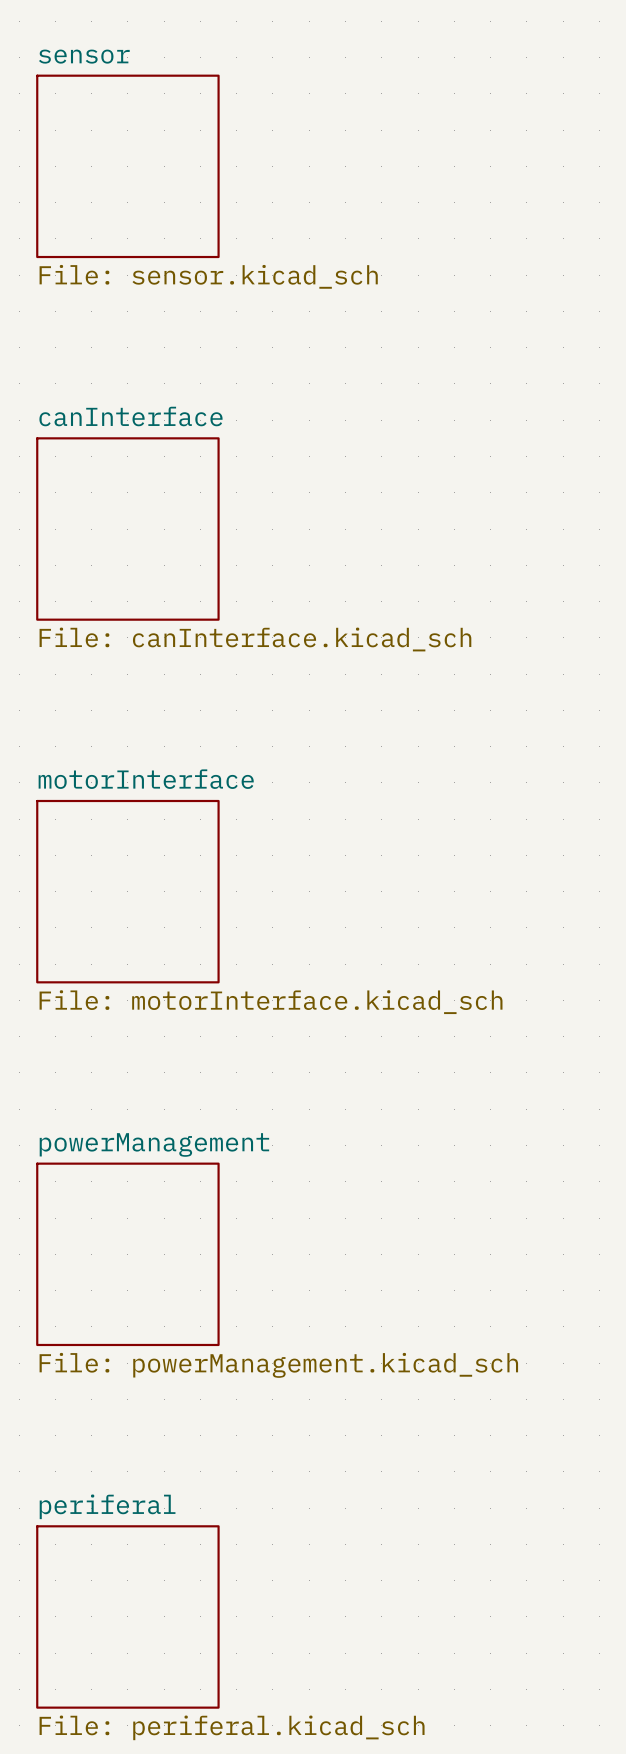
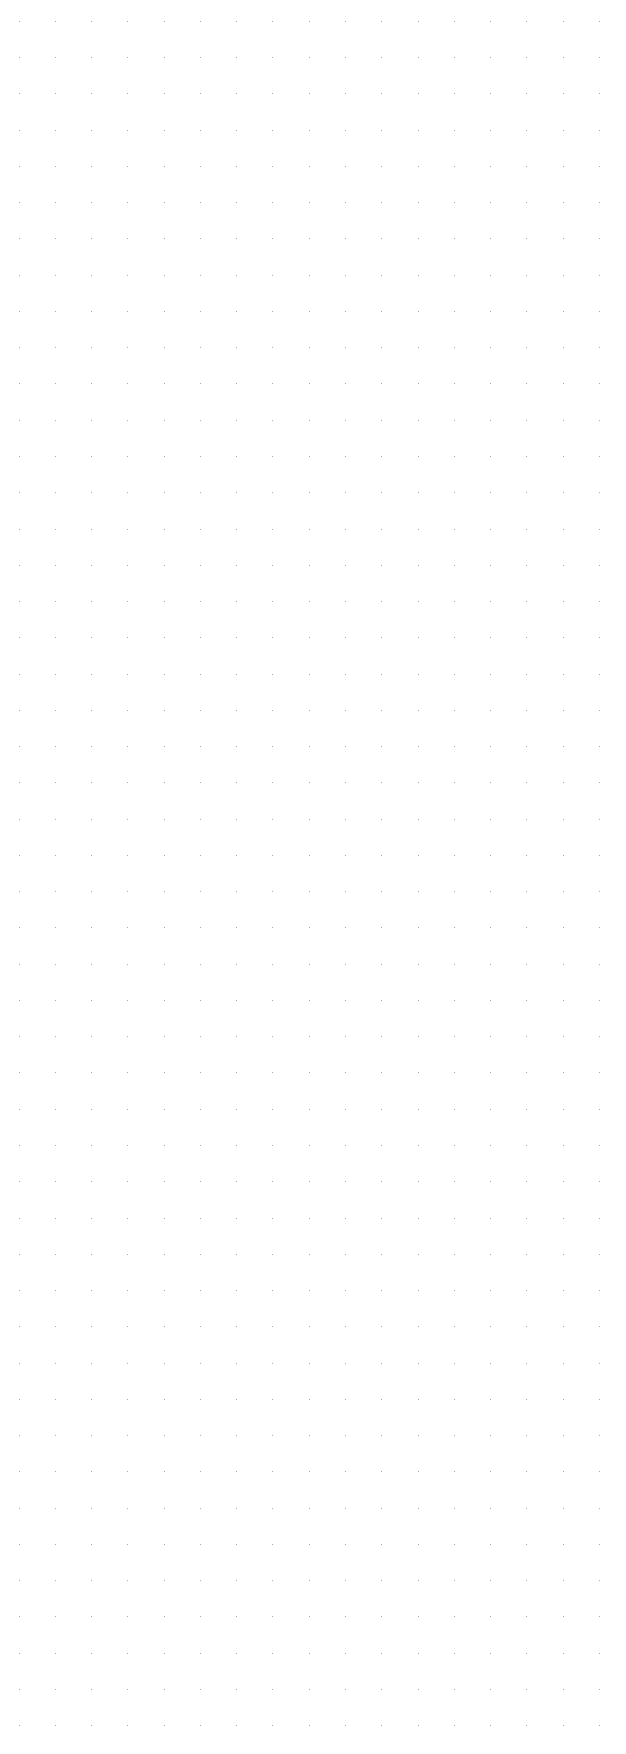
sheet sensor: File: sensor.kicad_sch (127, 166) -> none
sheet canInterface: File: canInterface.kicad_sch (127, 529) -> none
sheet motorInterface: File: motorInterface.kicad_sch (127, 891) -> none
sheet powerManagement: File: powerManagement.kicad_sch (127, 1254) -> none
sheet periferal: File: periferal.kicad_sch (127, 1616) -> none

